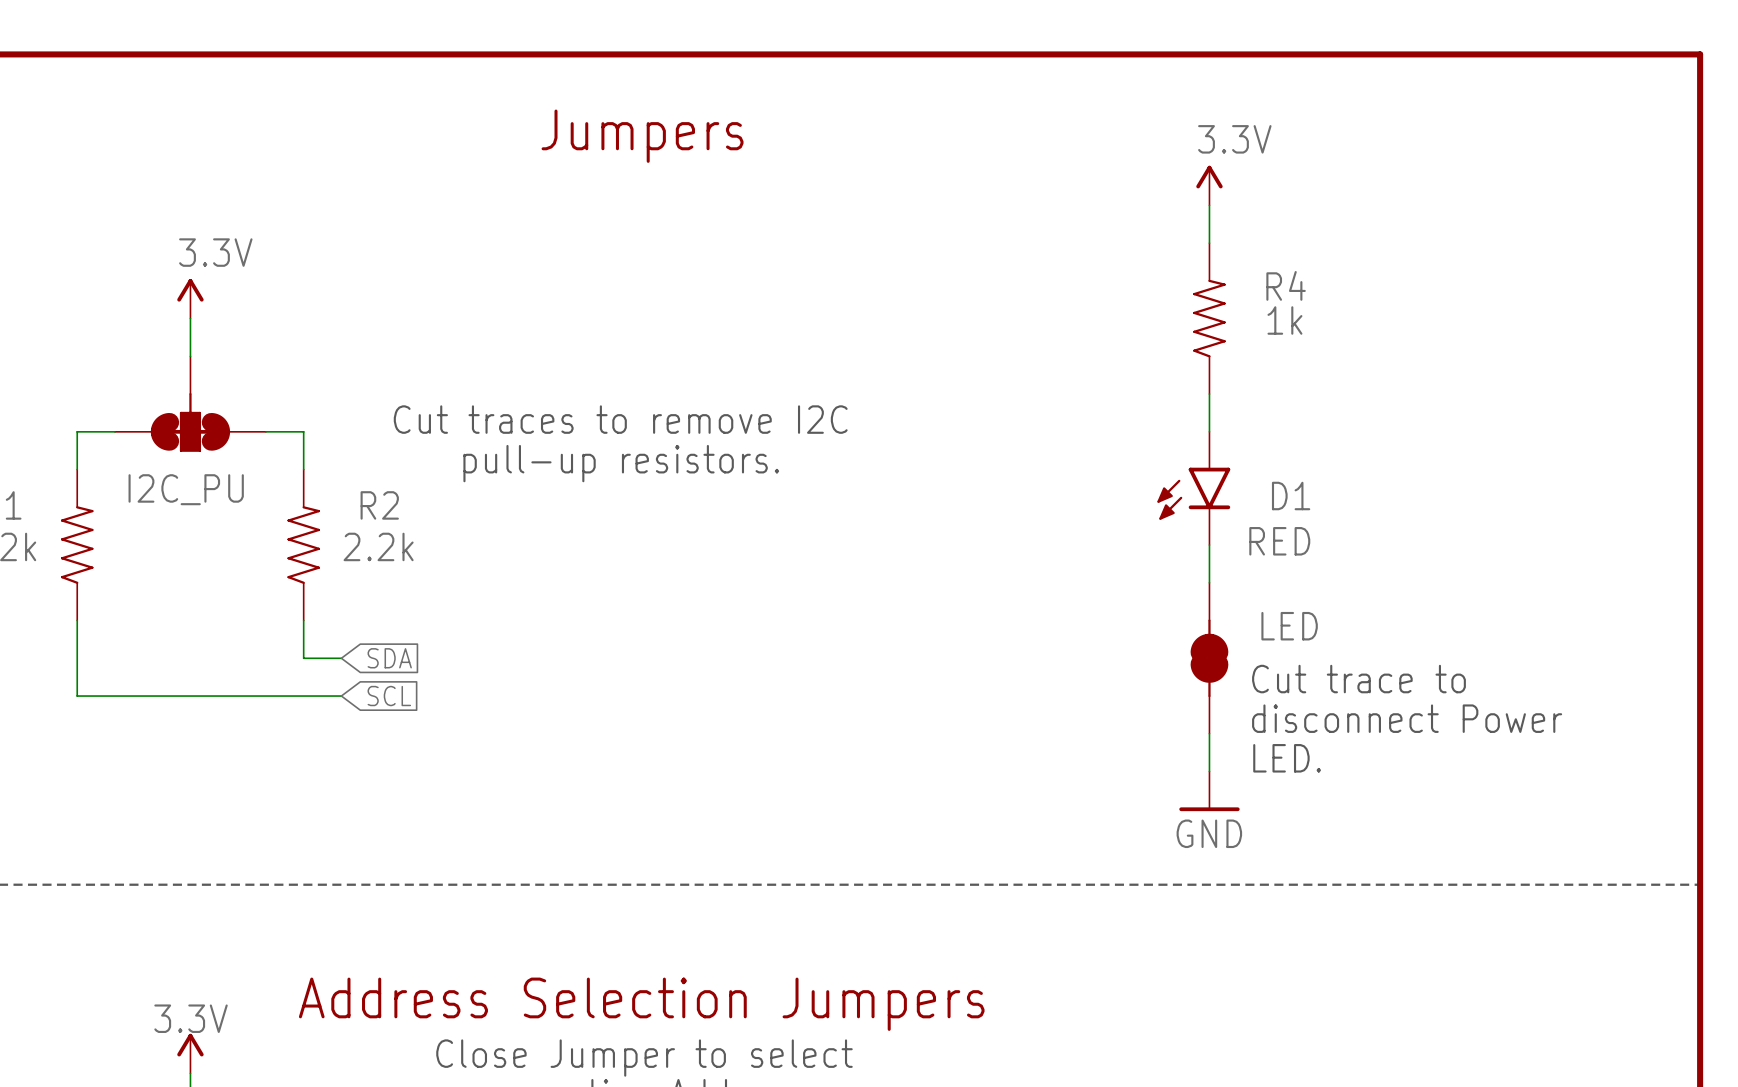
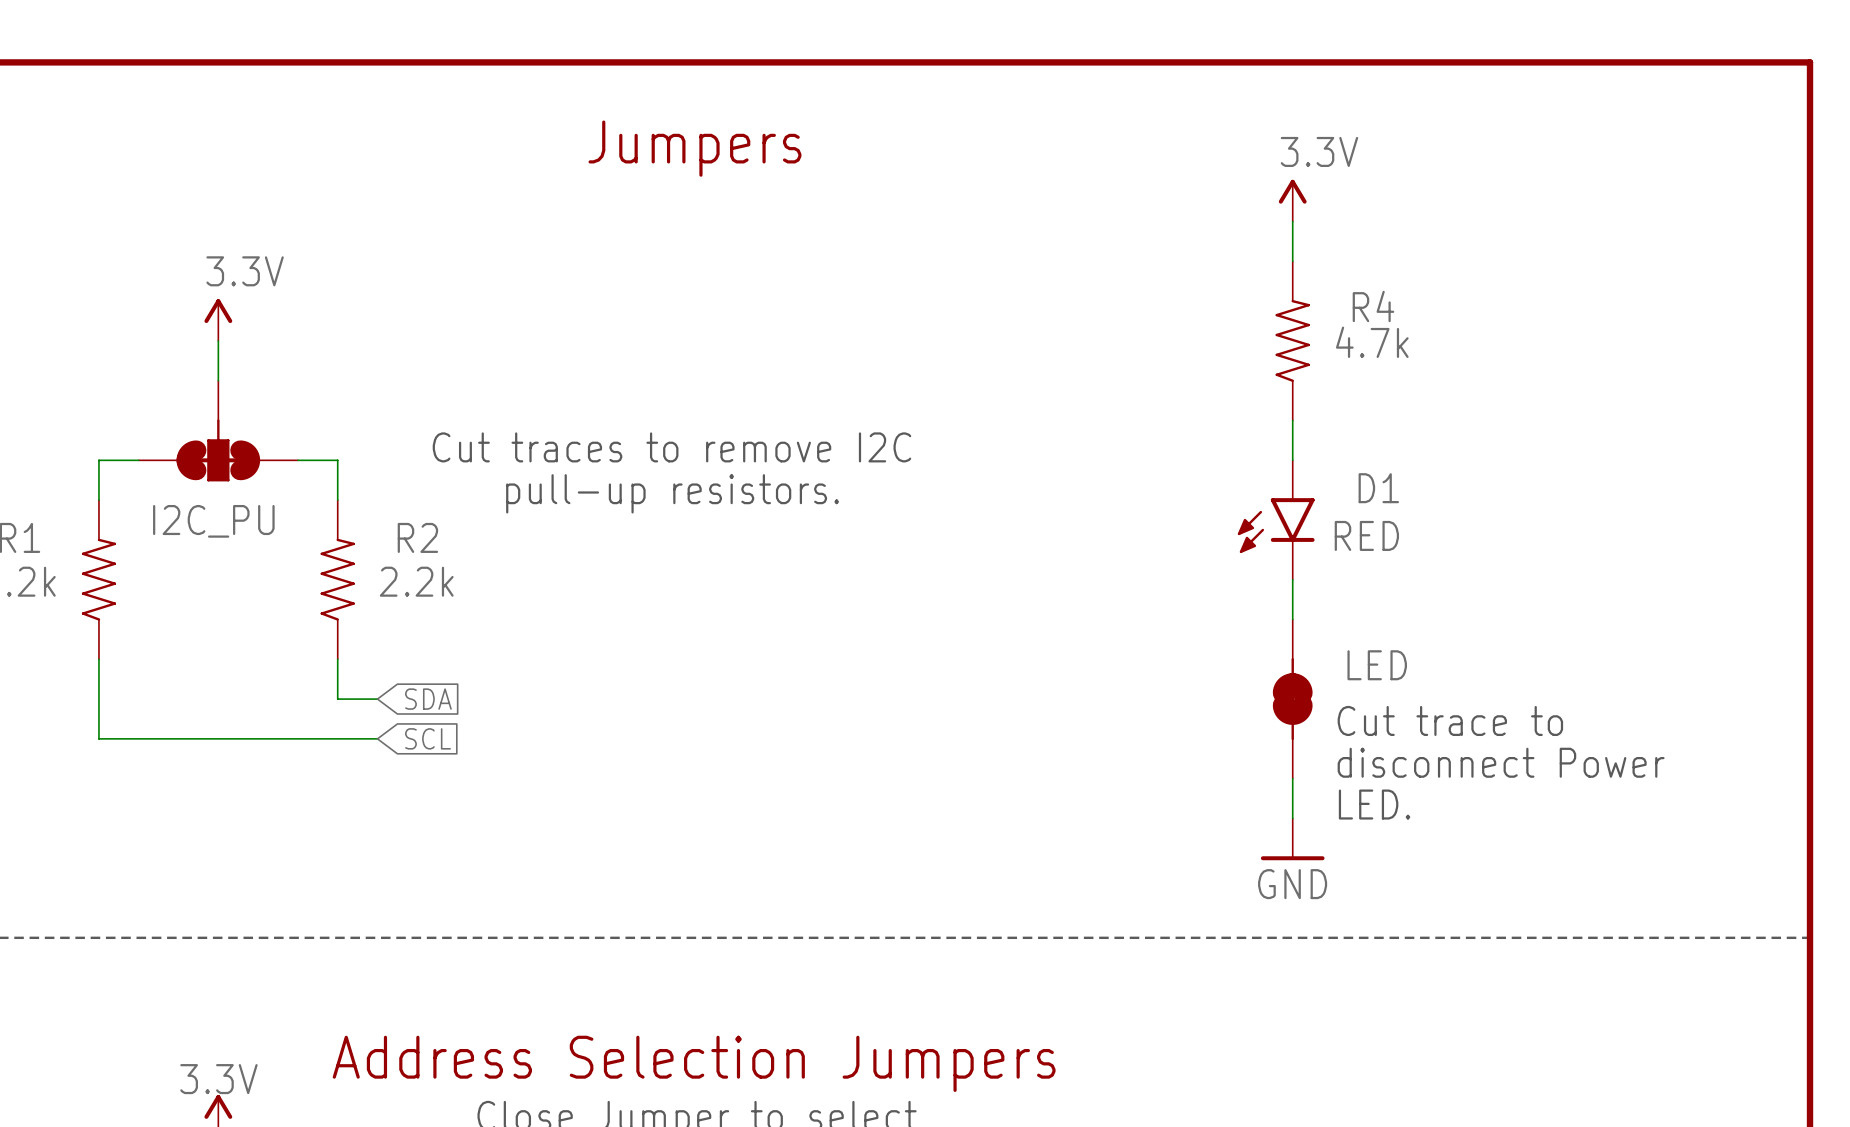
R4 value: 1k (1284, 320) -> 4.7k (1372, 342)
D1 name position: D1 (1291, 496) -> D1 (1378, 488)
D1 value position: RED (1279, 541) -> RED (1366, 535)

